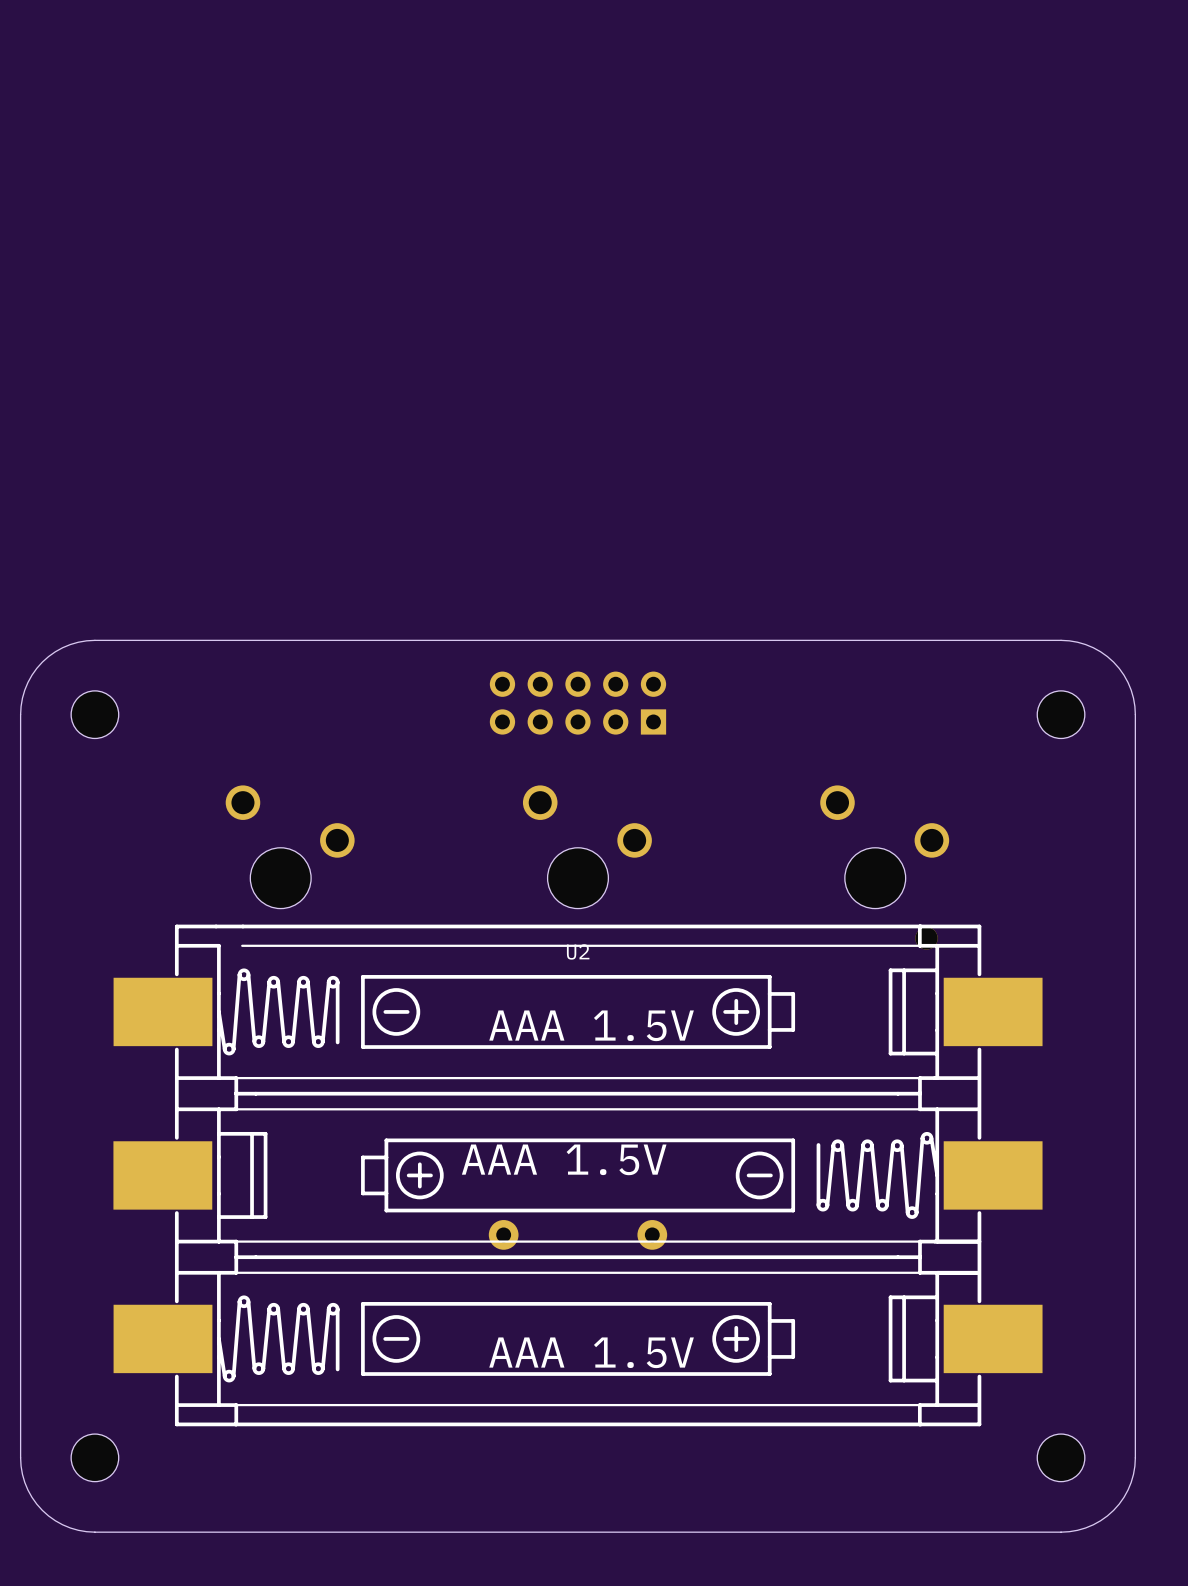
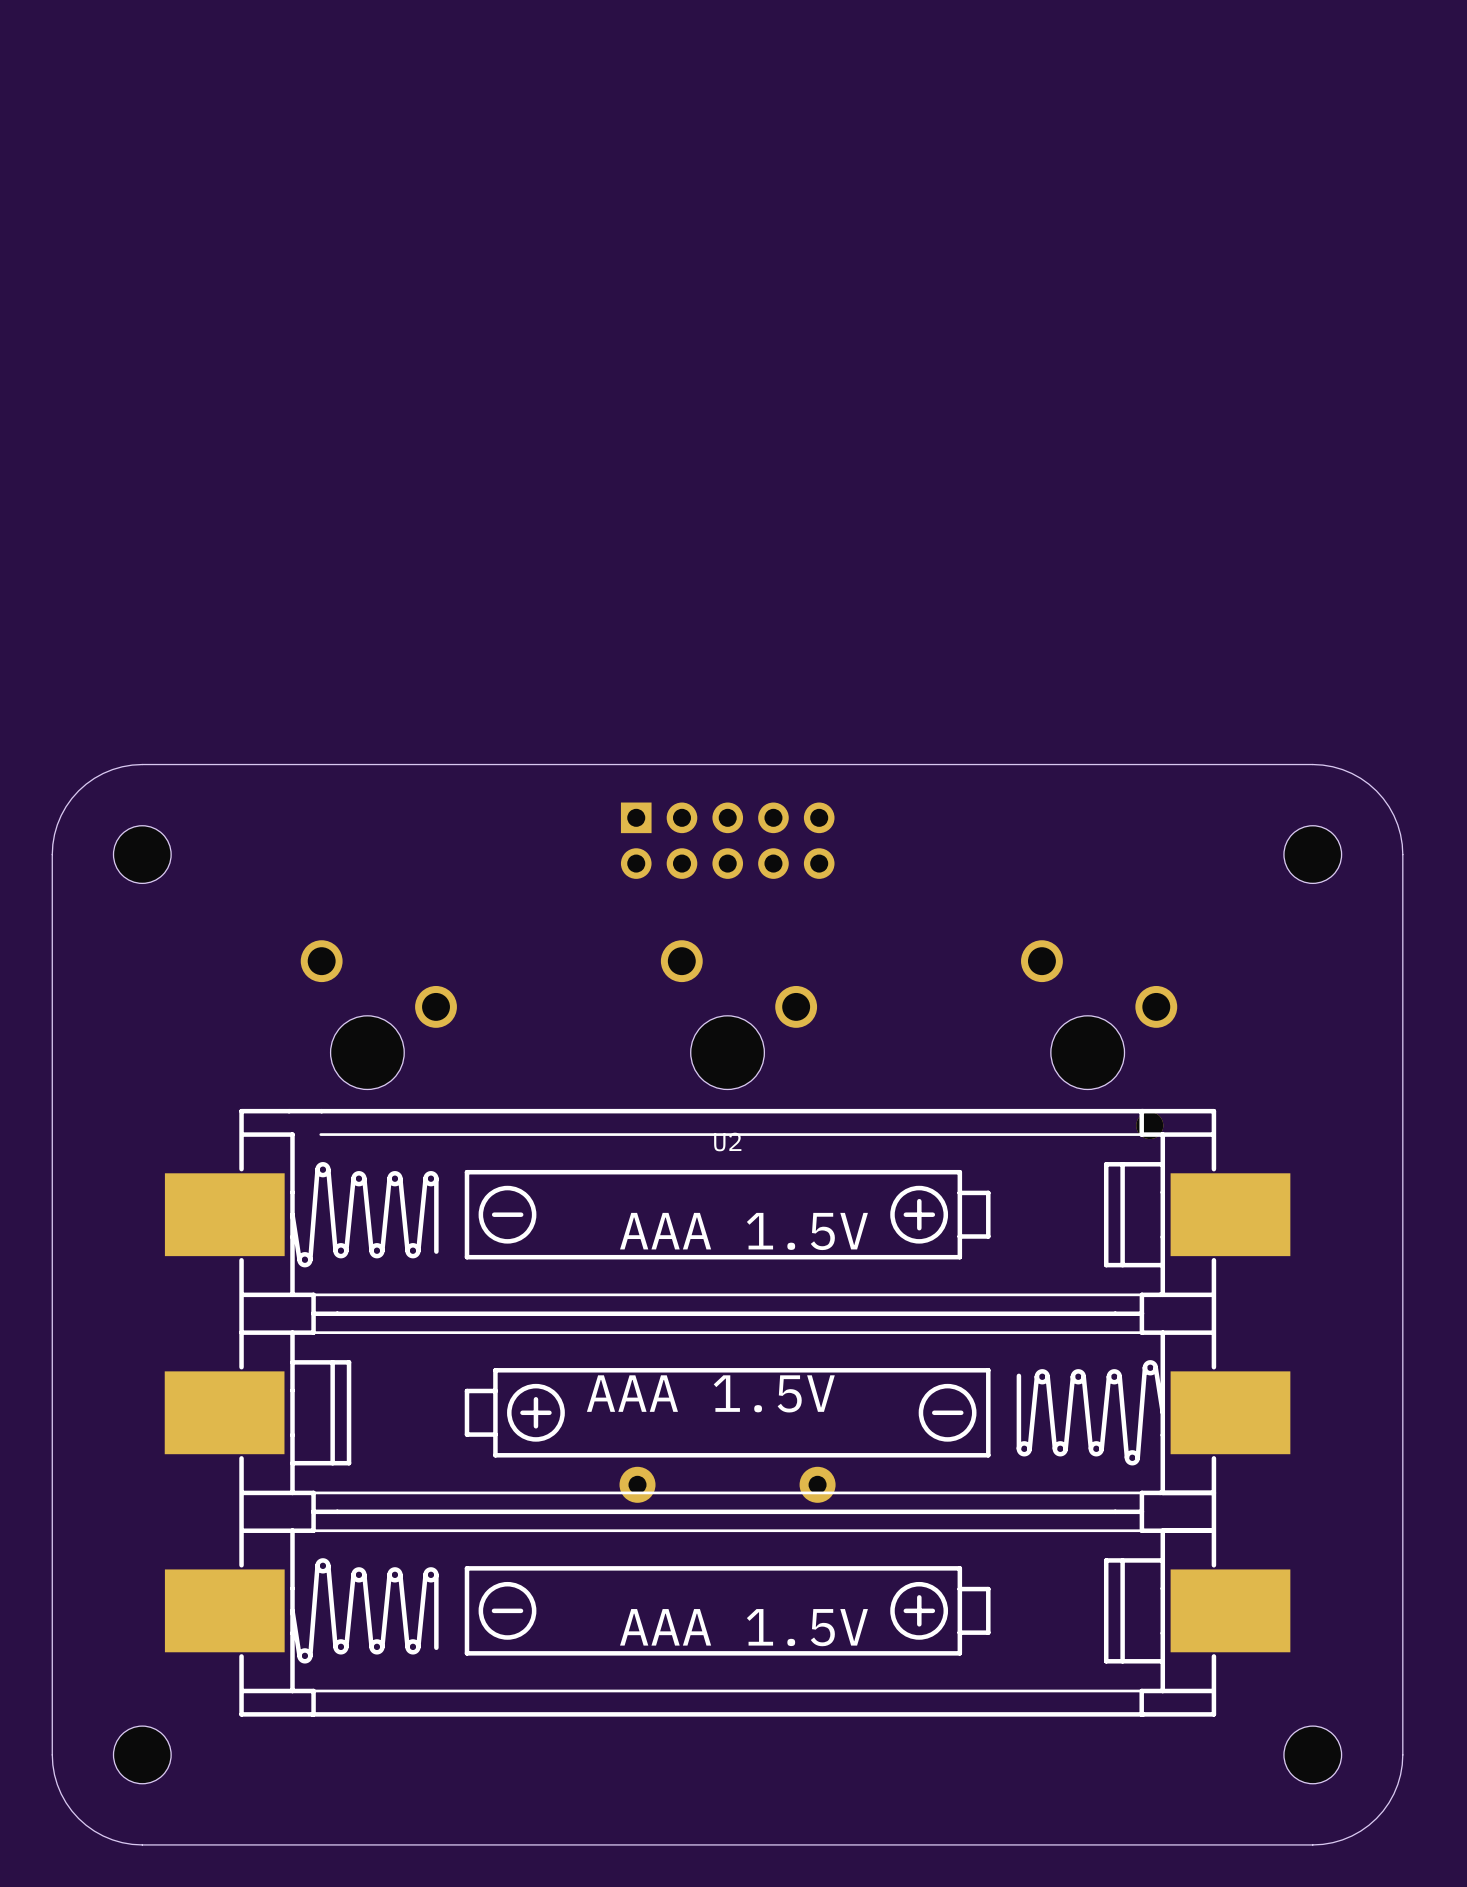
part rotation: 0° (577, 703) -> 180° (727, 840)

